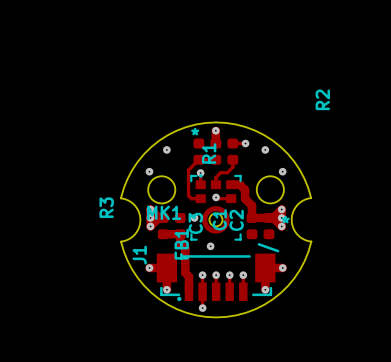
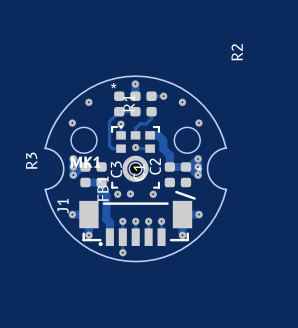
via: (194, 217) -> none
via: none -> (117, 194)
via: none -> (153, 194)

